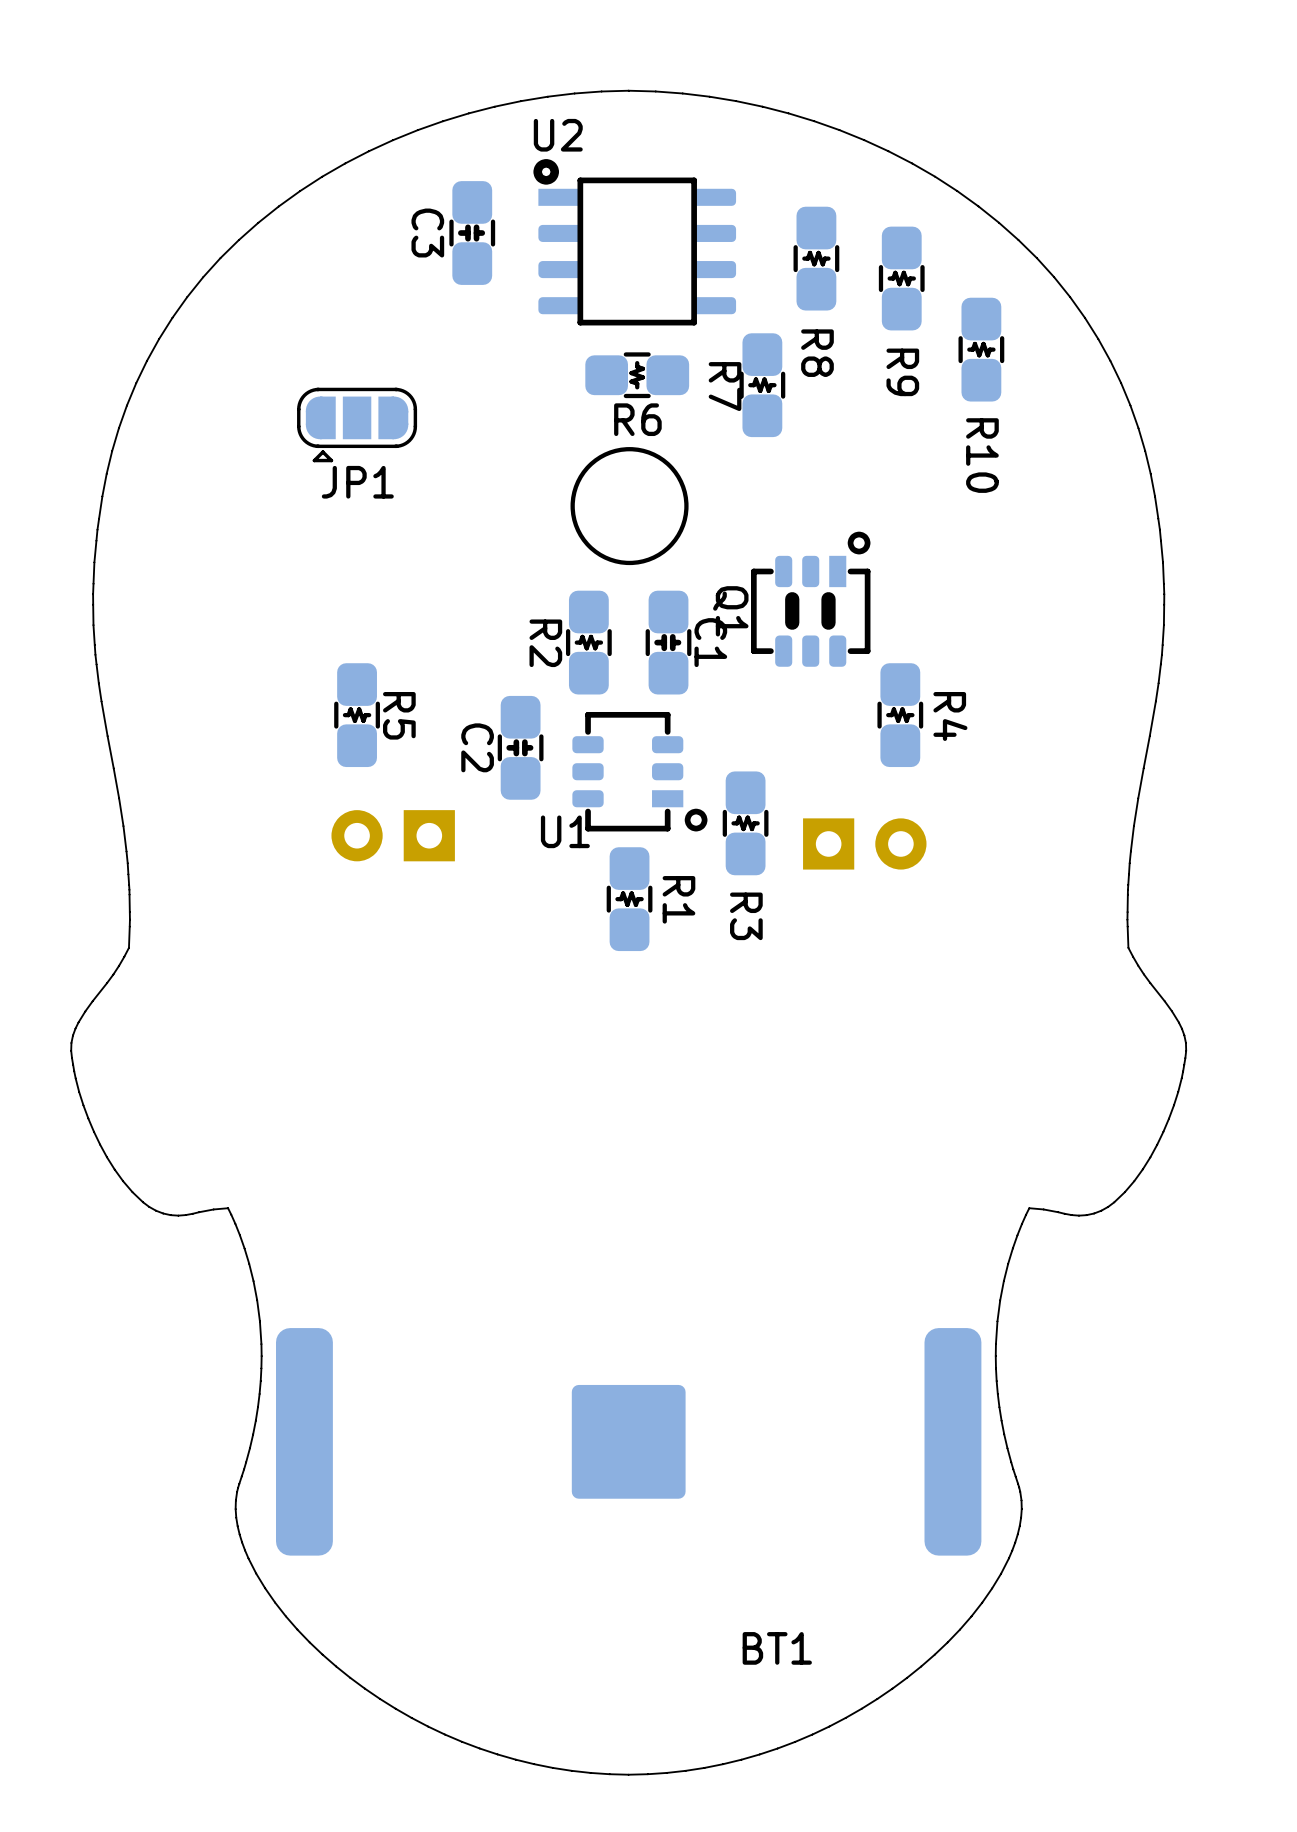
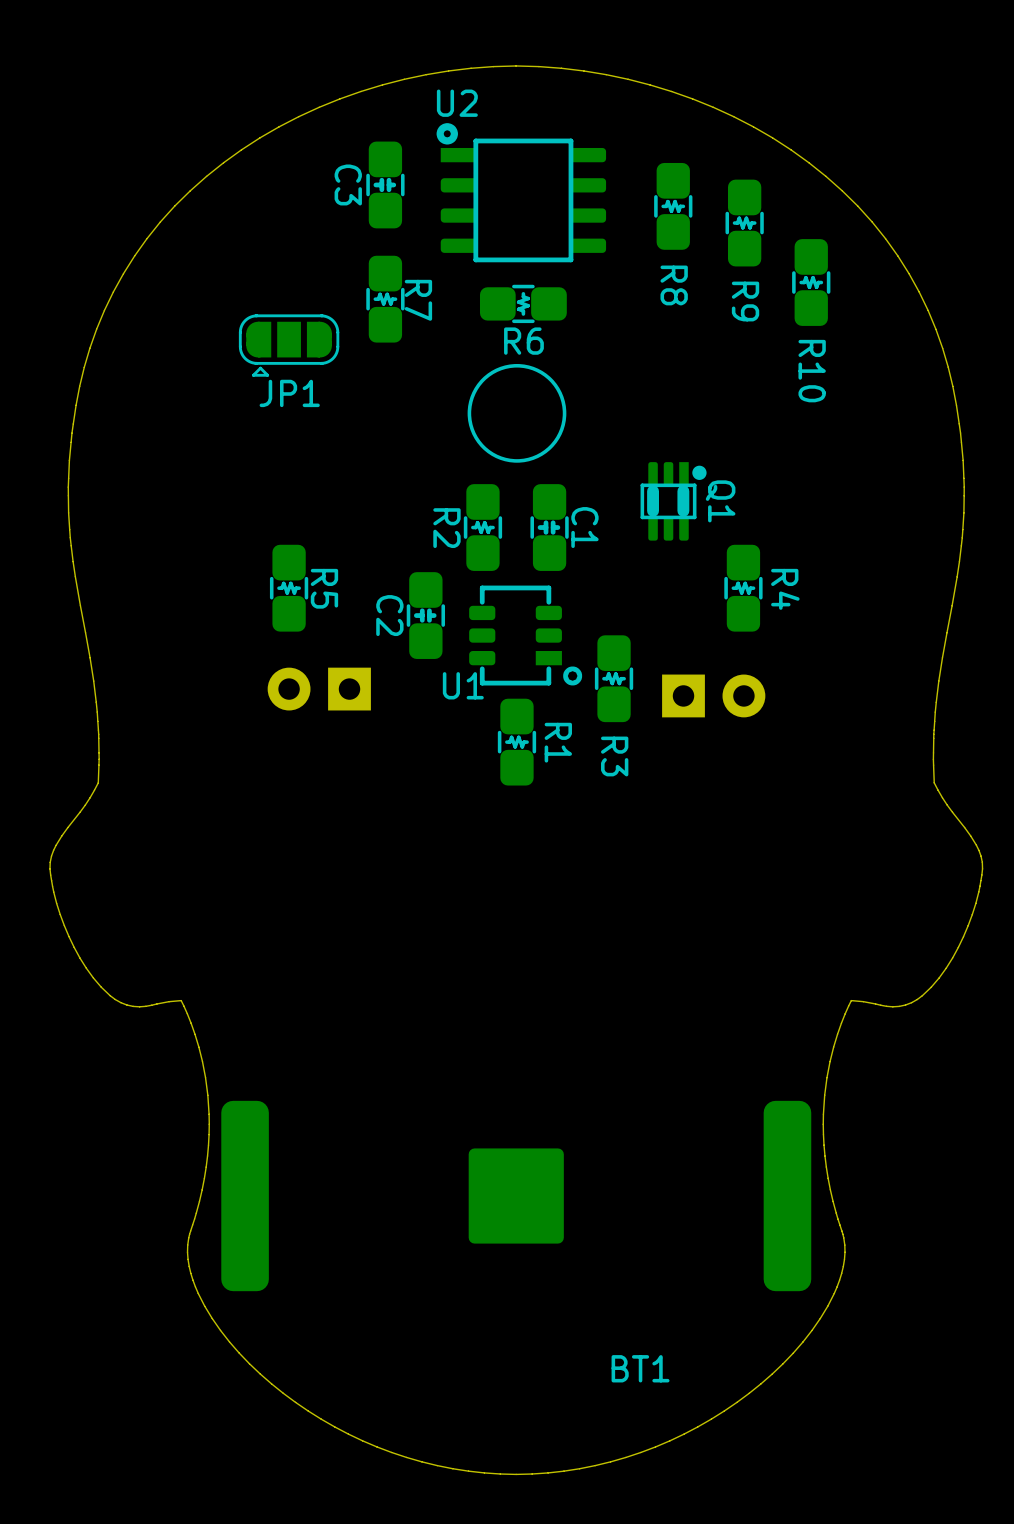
R7 position: (762, 385) -> (385, 299)
R7 name position: R7 (725, 386) -> R7 (418, 300)
Q1 footprint: [751, 531, 871, 667] -> [640, 462, 707, 541]
Q1 name position: Q1 (730, 611) -> Q1 (720, 501)

